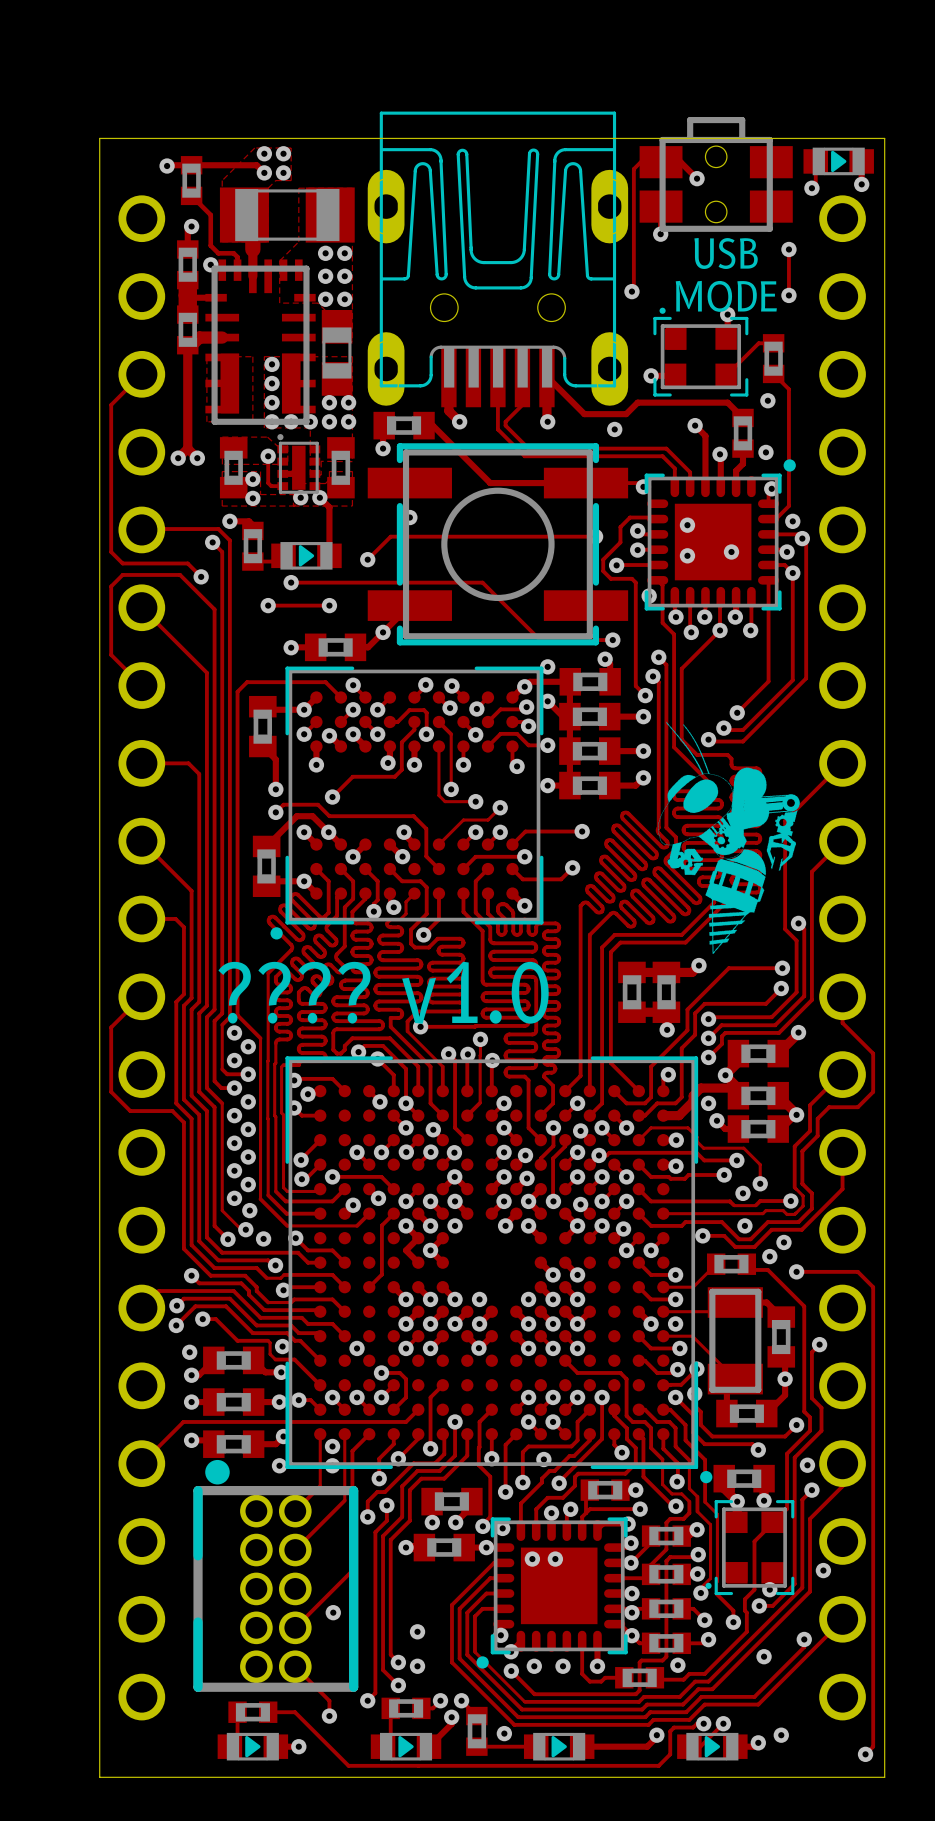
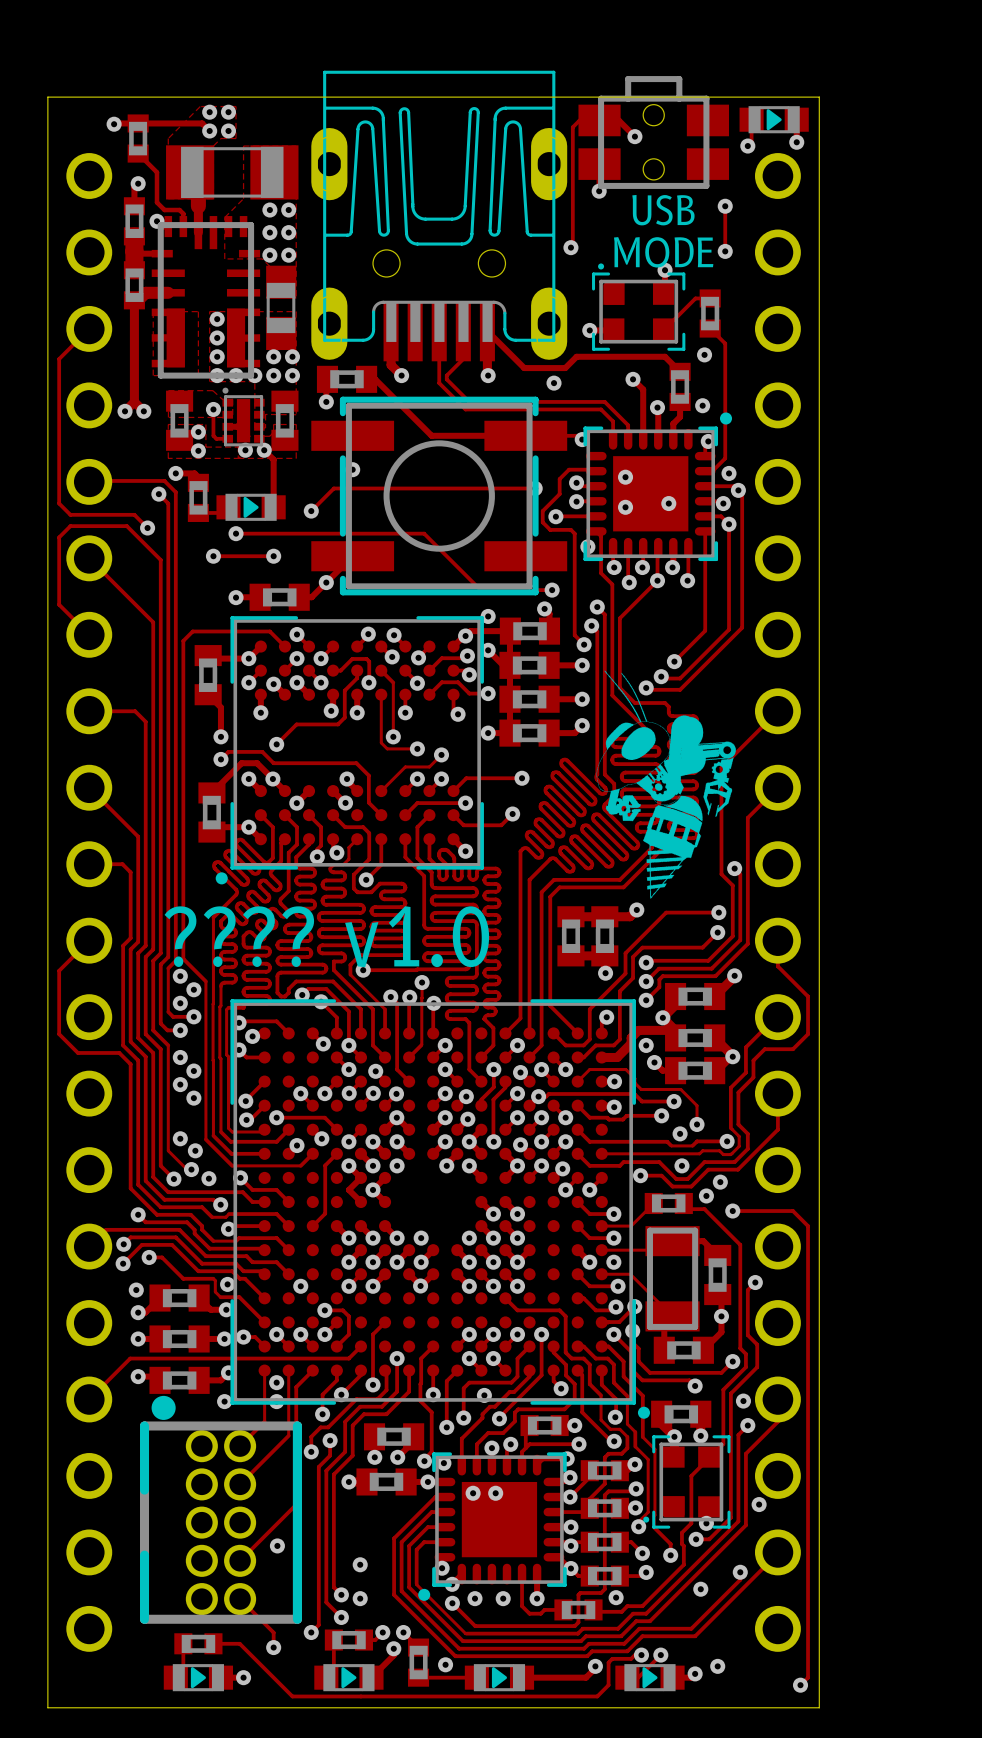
via: (248, 1101) -> none
via: (234, 1170) -> none
via: (248, 1184) -> none

